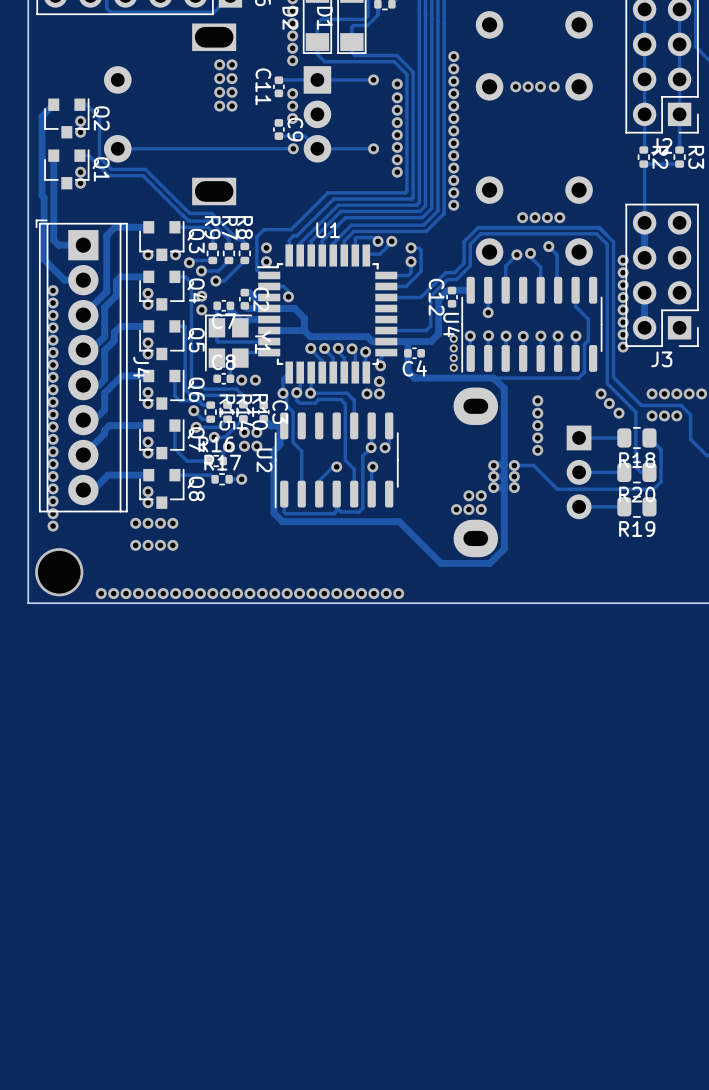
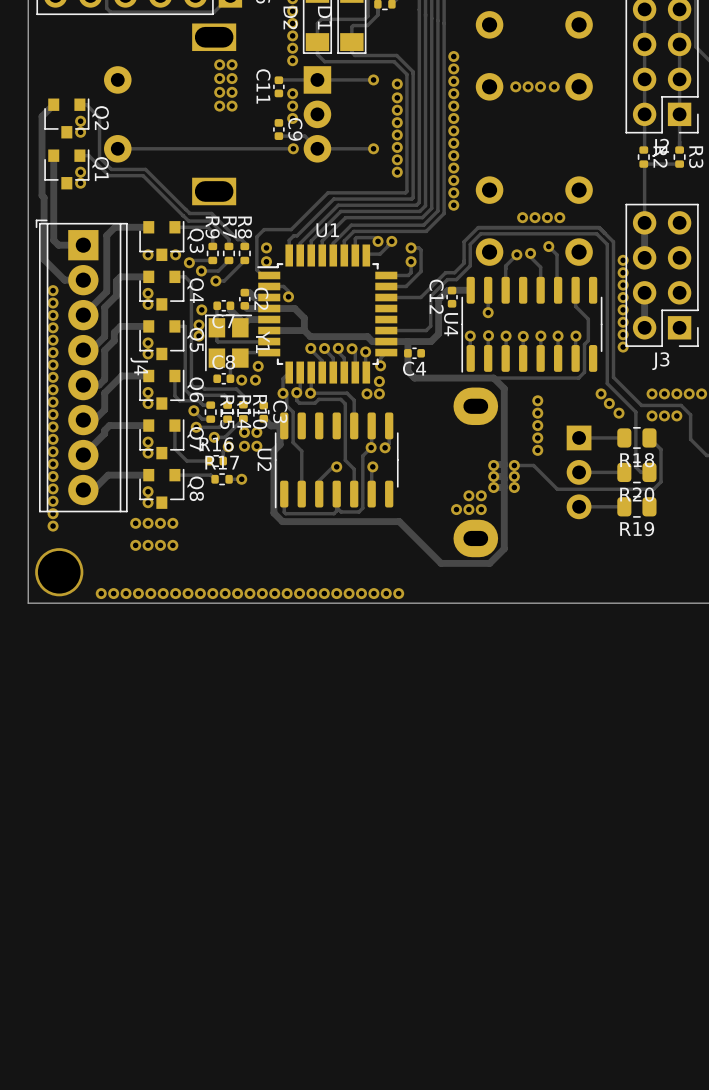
via: (201, 296) -> none
via: none -> (199, 325)
via: none -> (199, 336)
via: (453, 338) -> none
via: (453, 348) -> none
via: (453, 358) -> none
via: none -> (258, 366)
via: (453, 367) -> none

